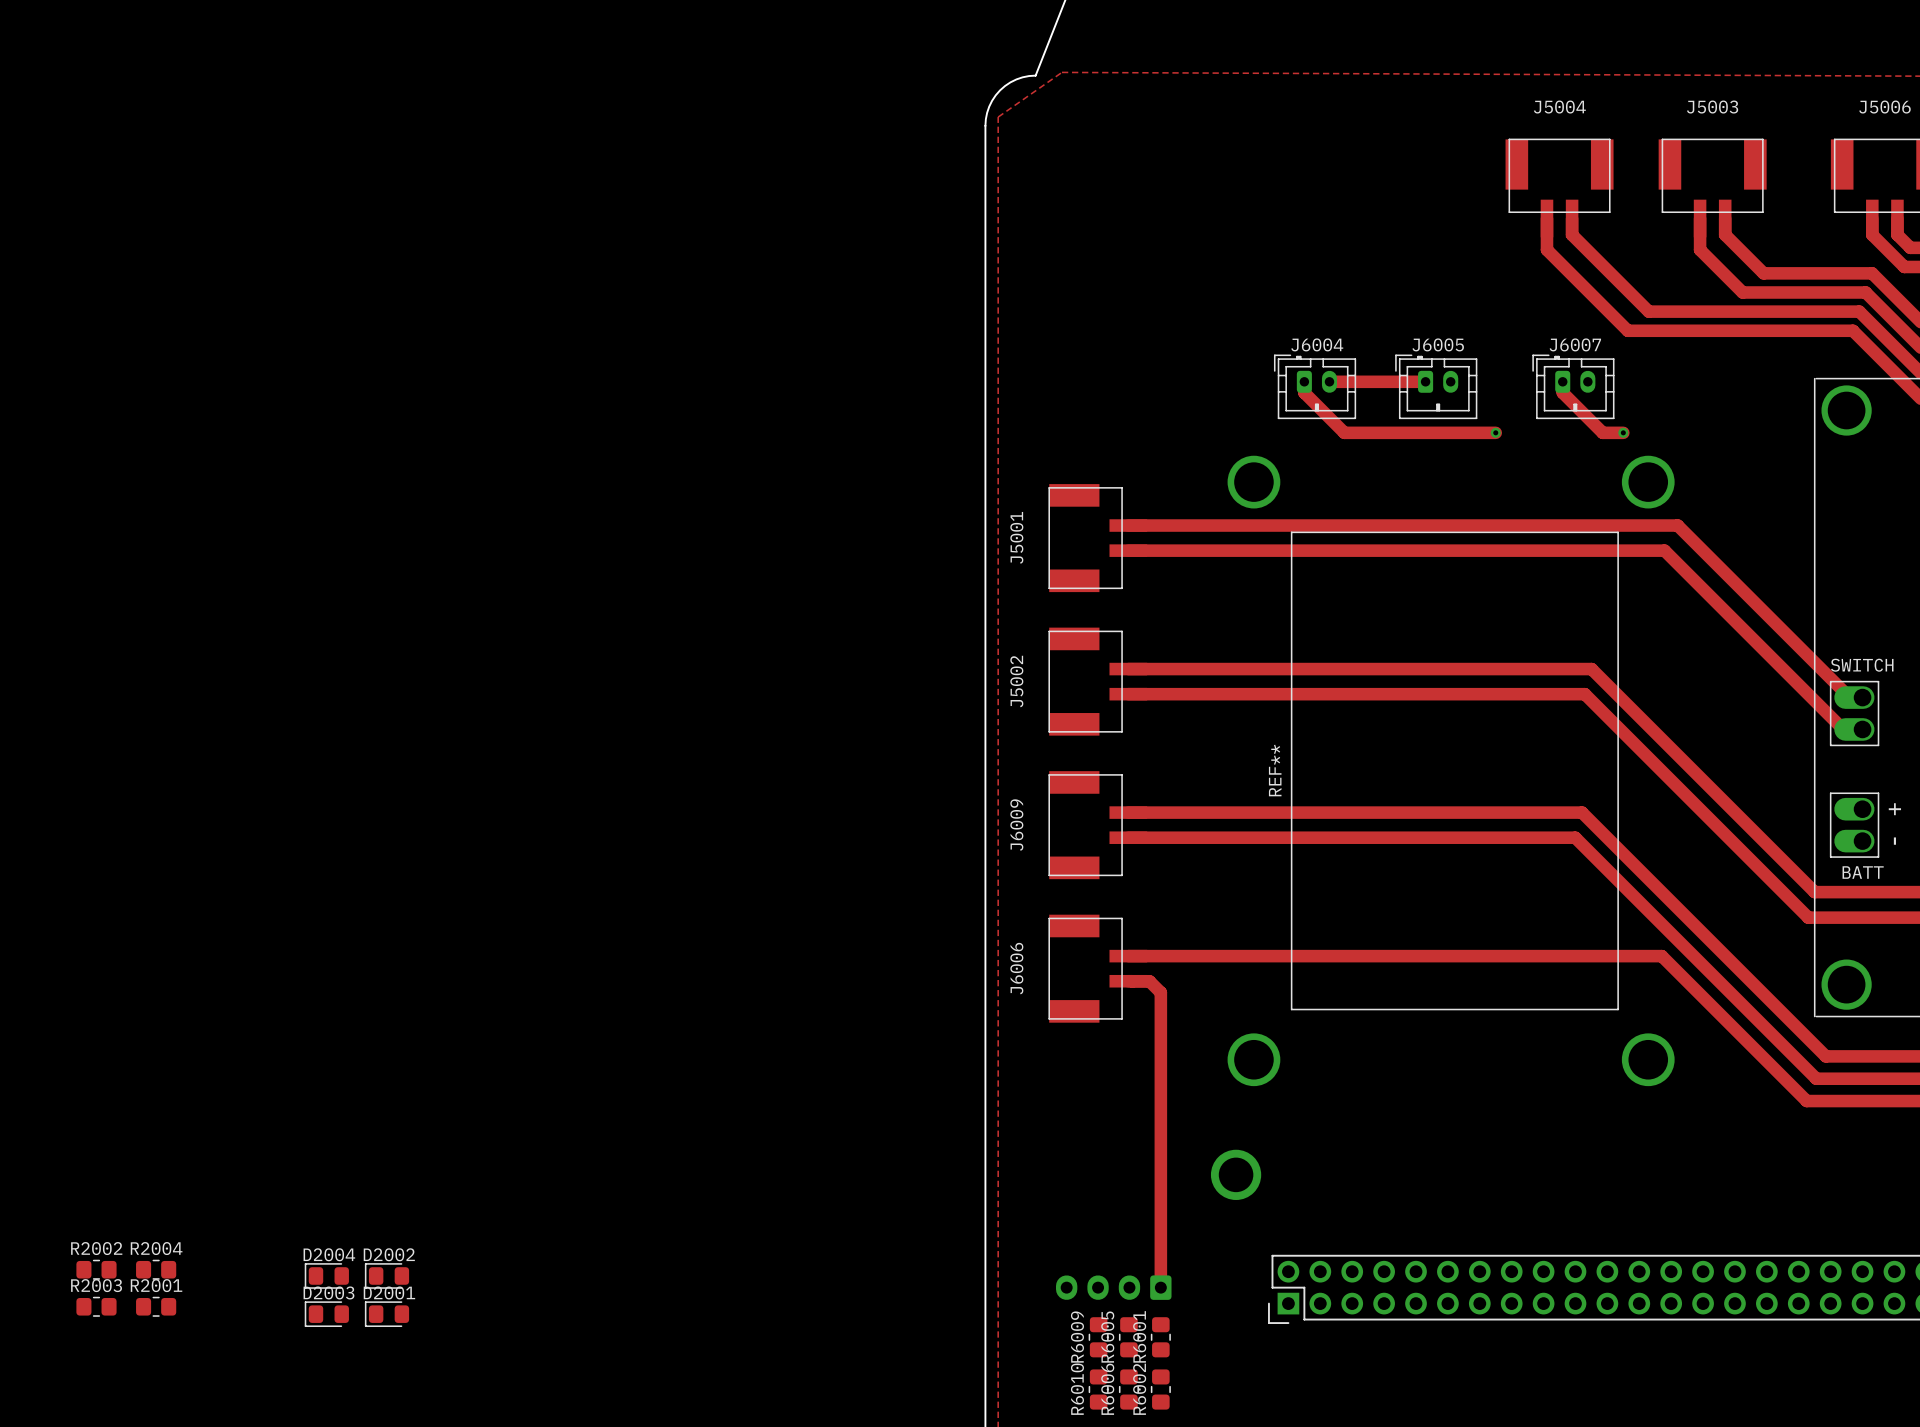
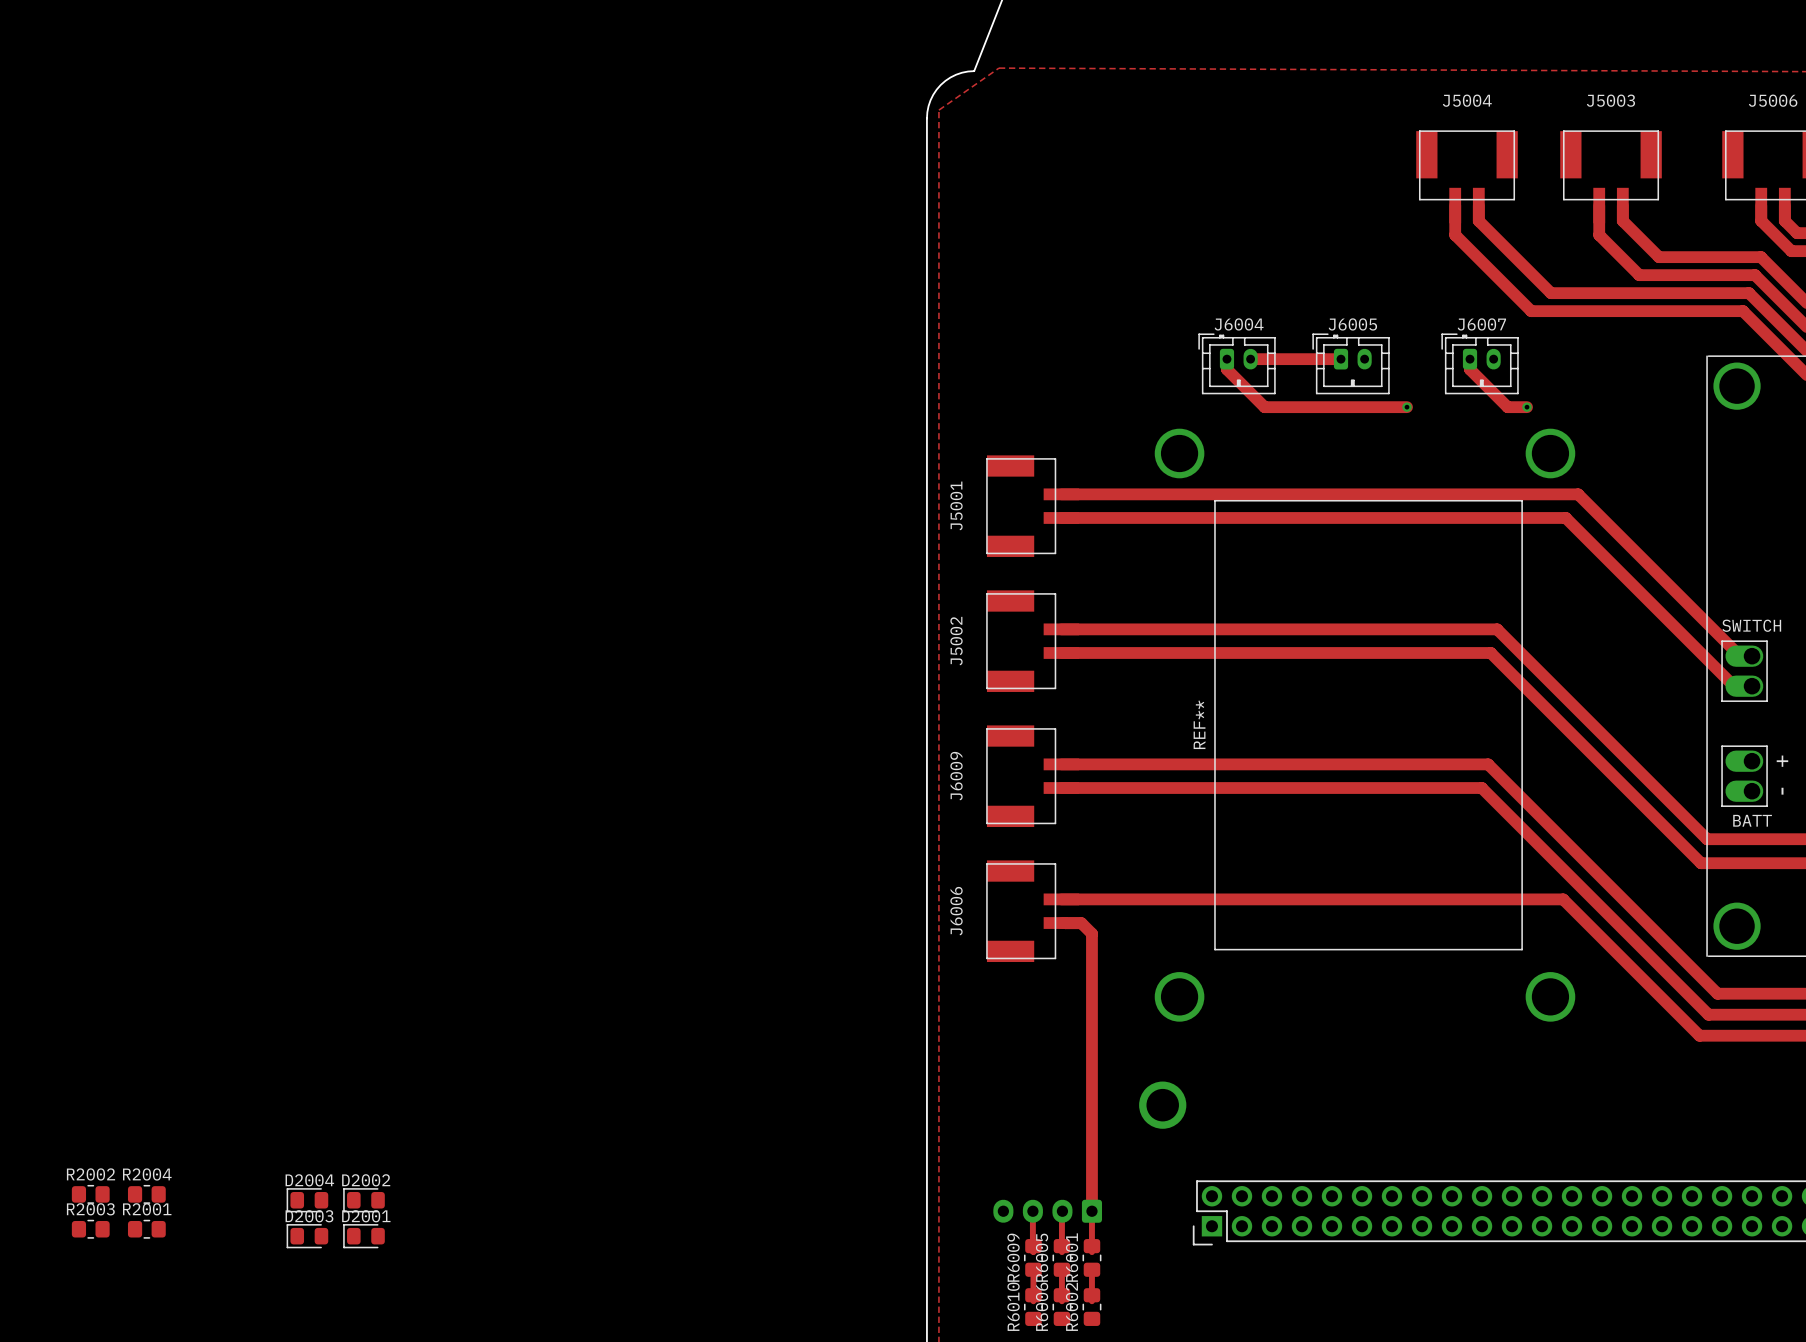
track: none -> (1032, 1211) (1033, 1252)
track: none -> (1062, 1211) (1061, 1252)
track: none -> (1091, 1211) (1091, 1252)
track: none -> (1033, 1275) (1033, 1301)
track: none -> (1061, 1275) (1061, 1301)
track: none -> (1091, 1275) (1091, 1301)

